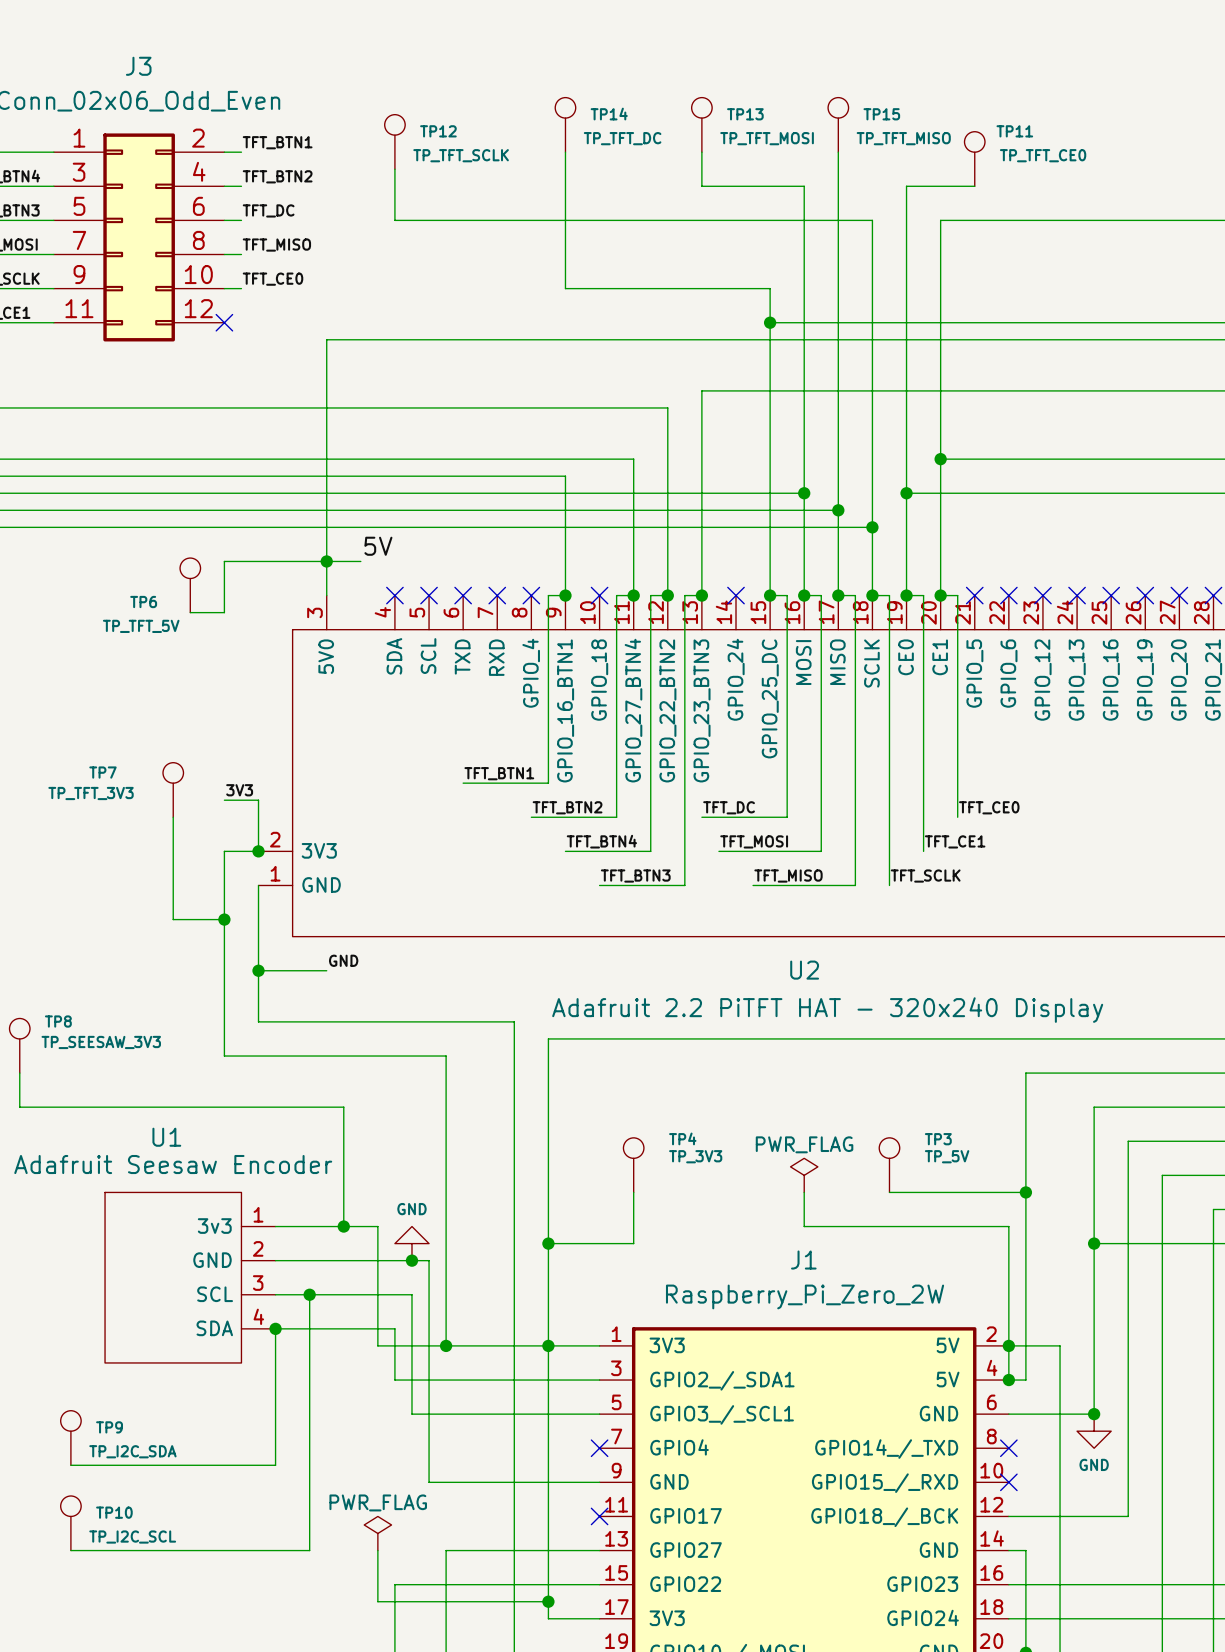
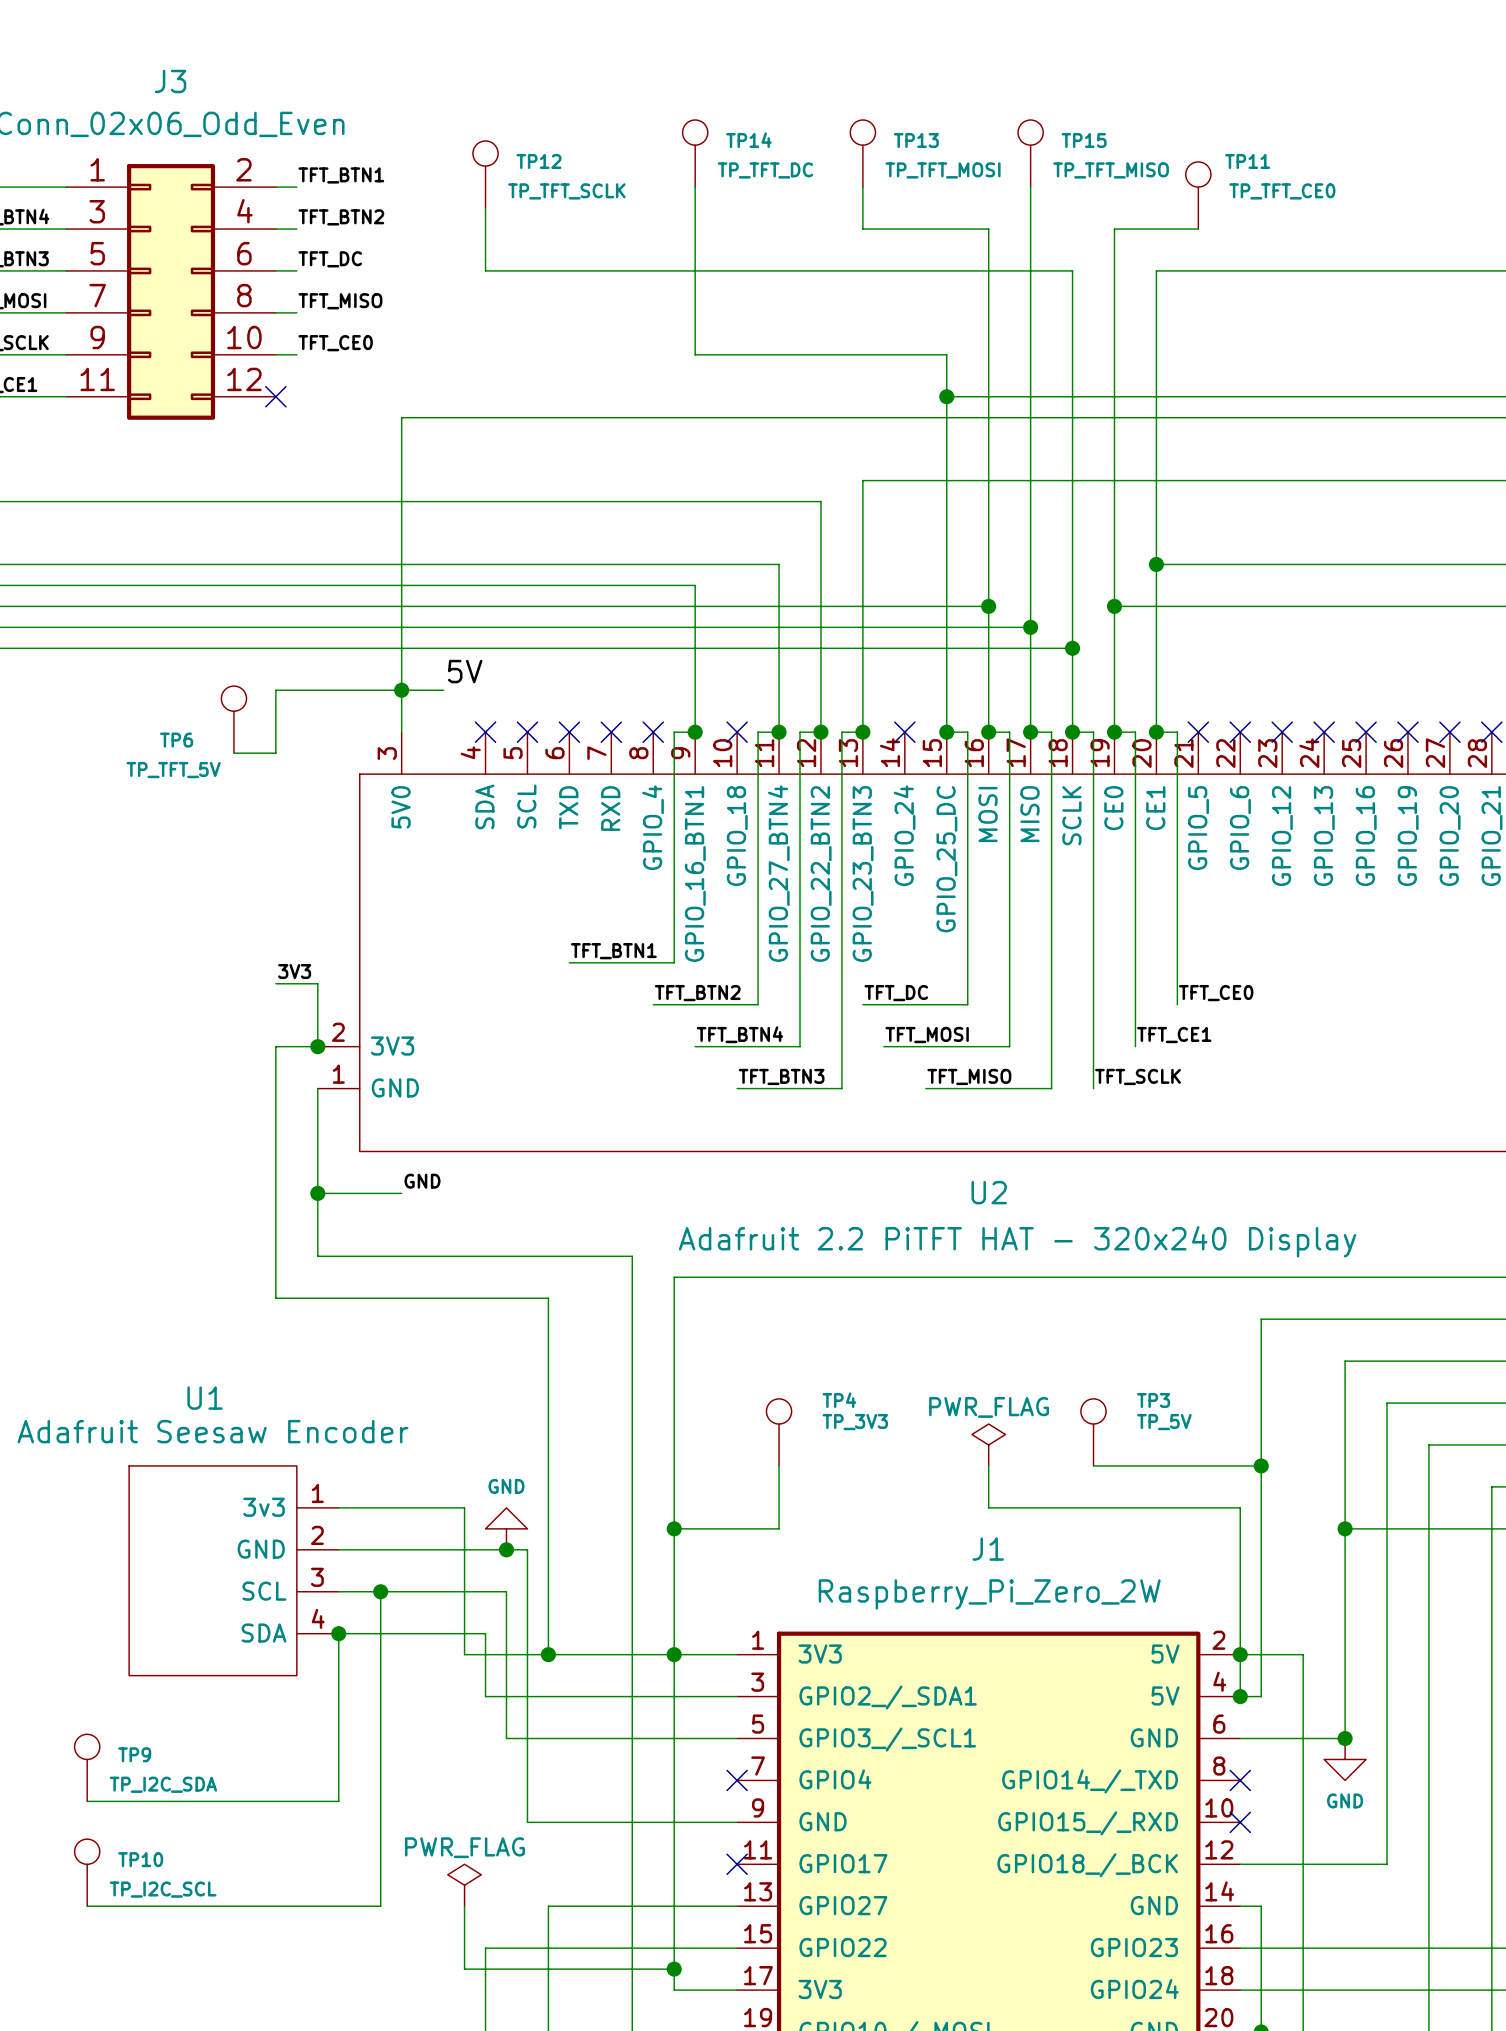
TP7: TP_TFT_3V3 (173, 789) -> none
wire: (173, 817) (173, 919) (224, 919) -> none
junction: (224, 919) -> none
TP8: TP_SEESAW_3V3 (19, 1045) -> none
wire: (19, 1073) (19, 1107) (343, 1107) (343, 1226) -> none
junction: (343, 1226) -> none

